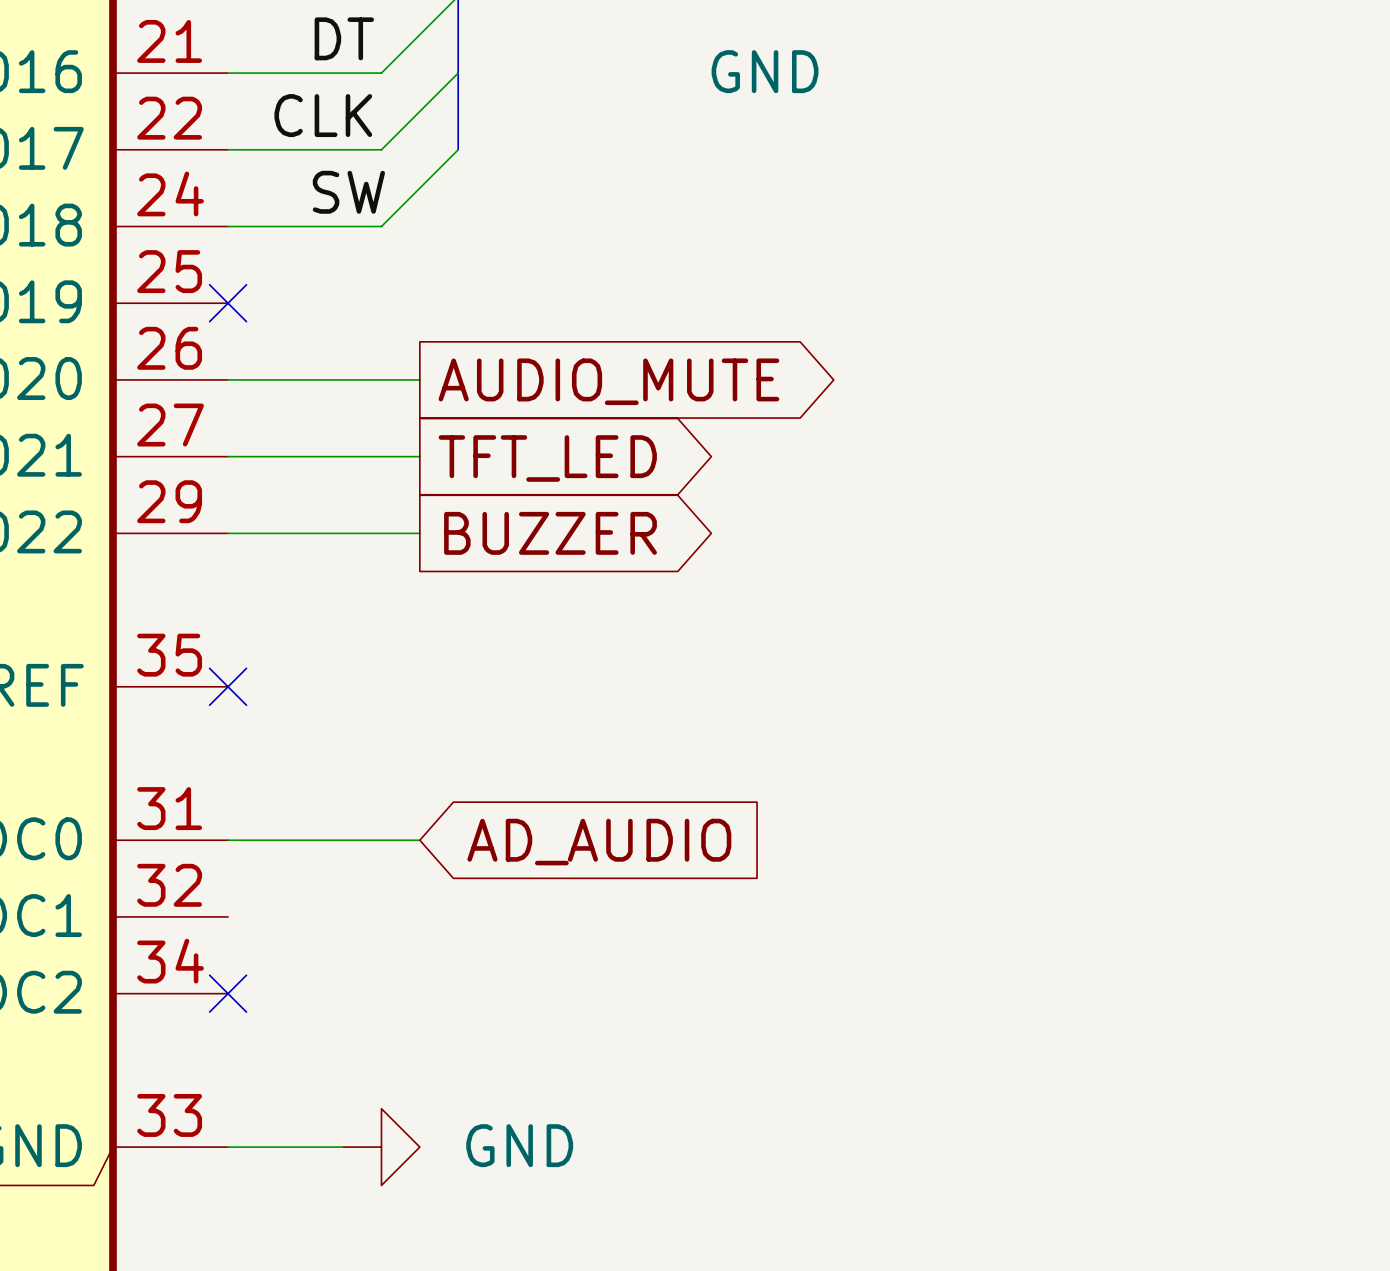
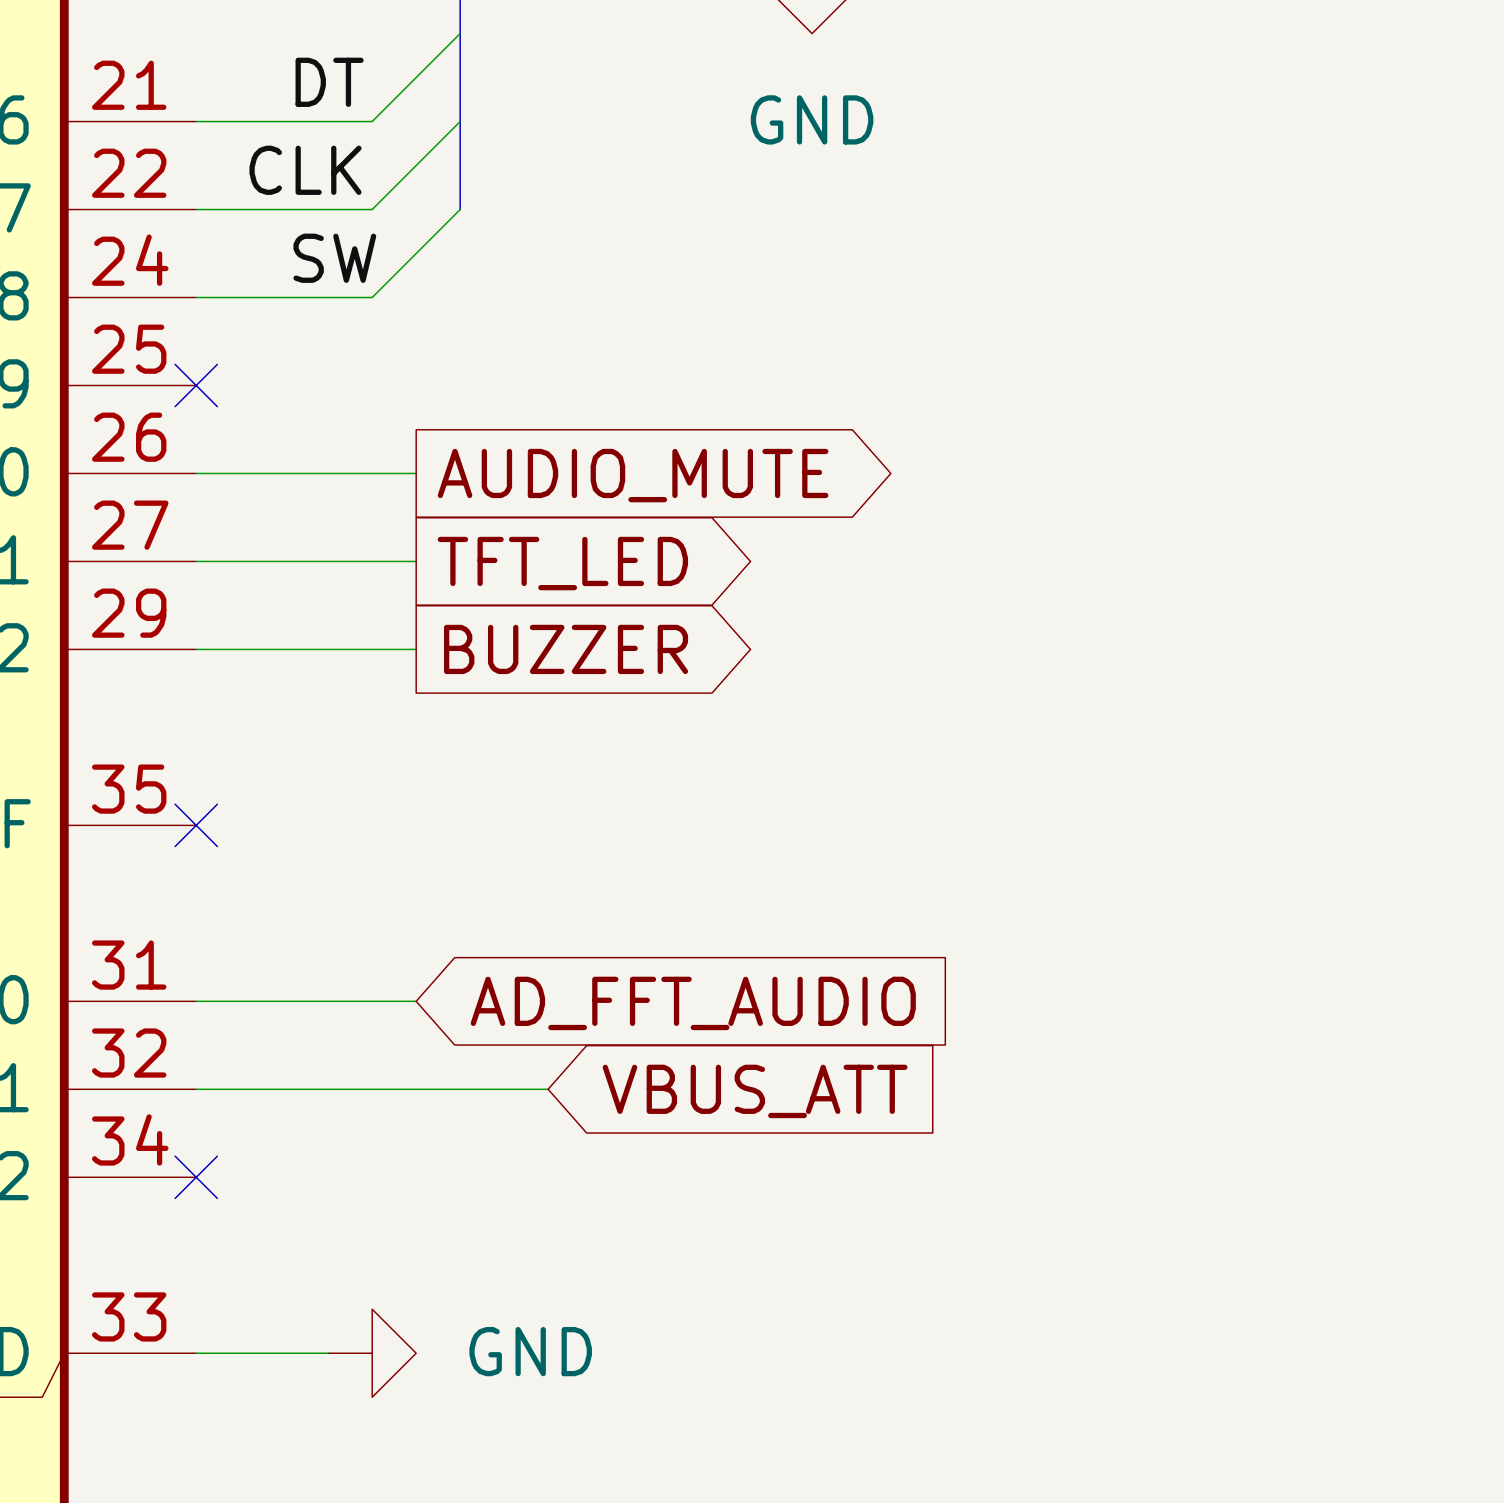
global label: AD_AUDIO (599, 842) -> AD_FFT_AUDIO (693, 1003)
wire: none -> (196, 1089) (548, 1089)
global label: none -> VBUS_ATT (755, 1091)

